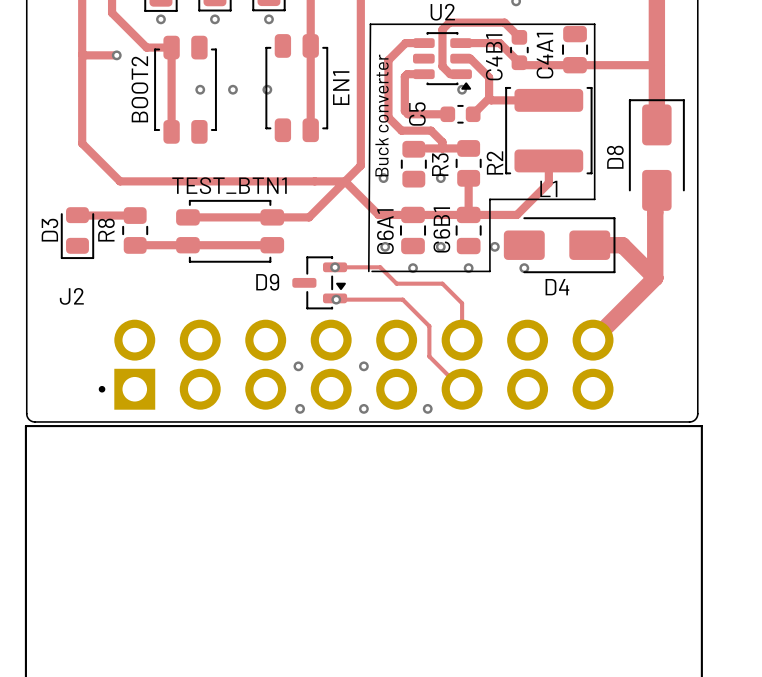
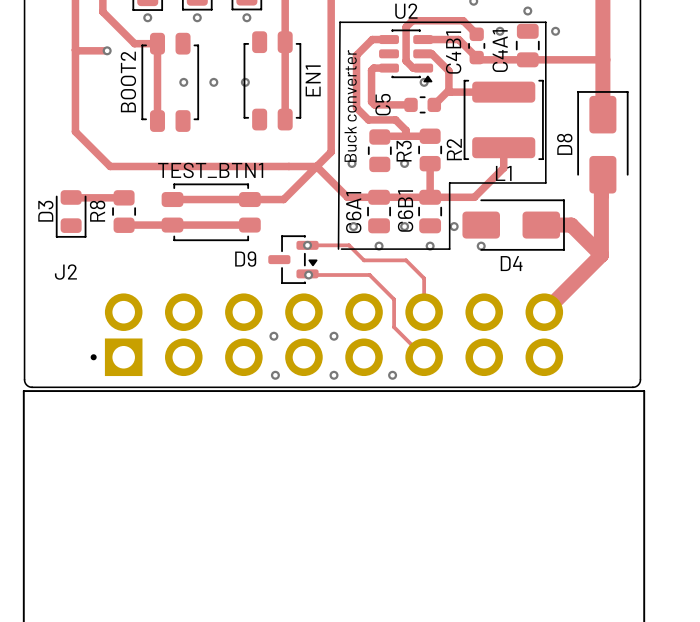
via: none -> (527, 11)
via: none -> (499, 31)
via: none -> (555, 31)

